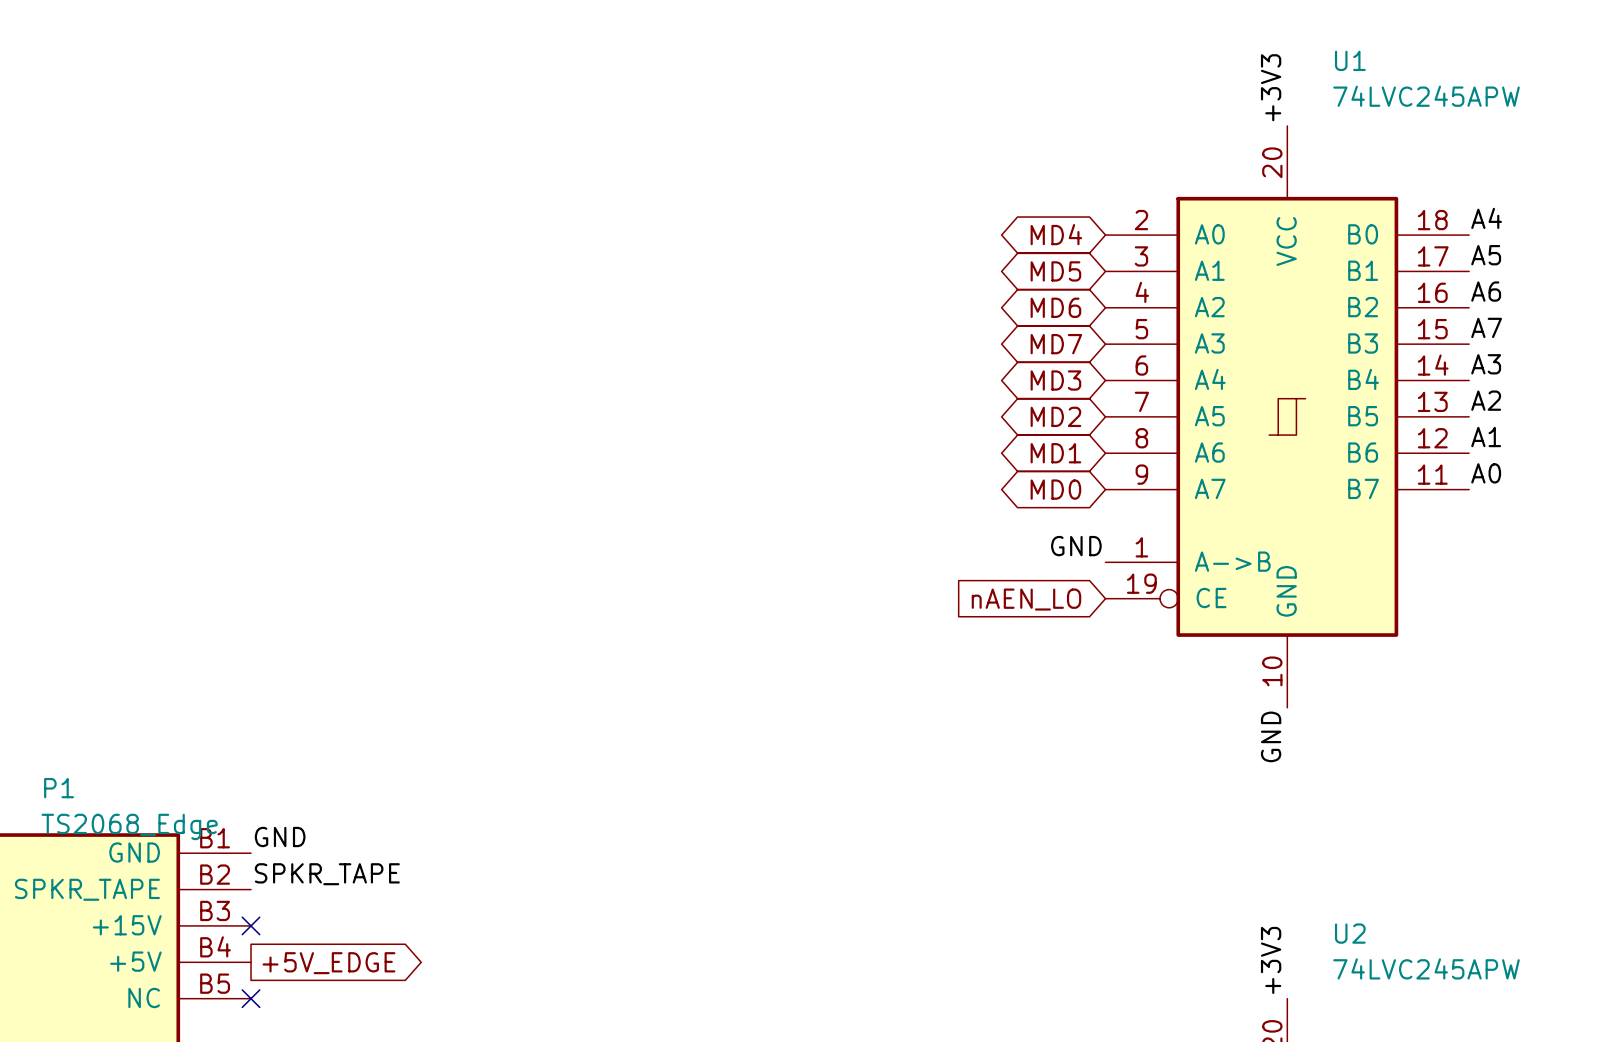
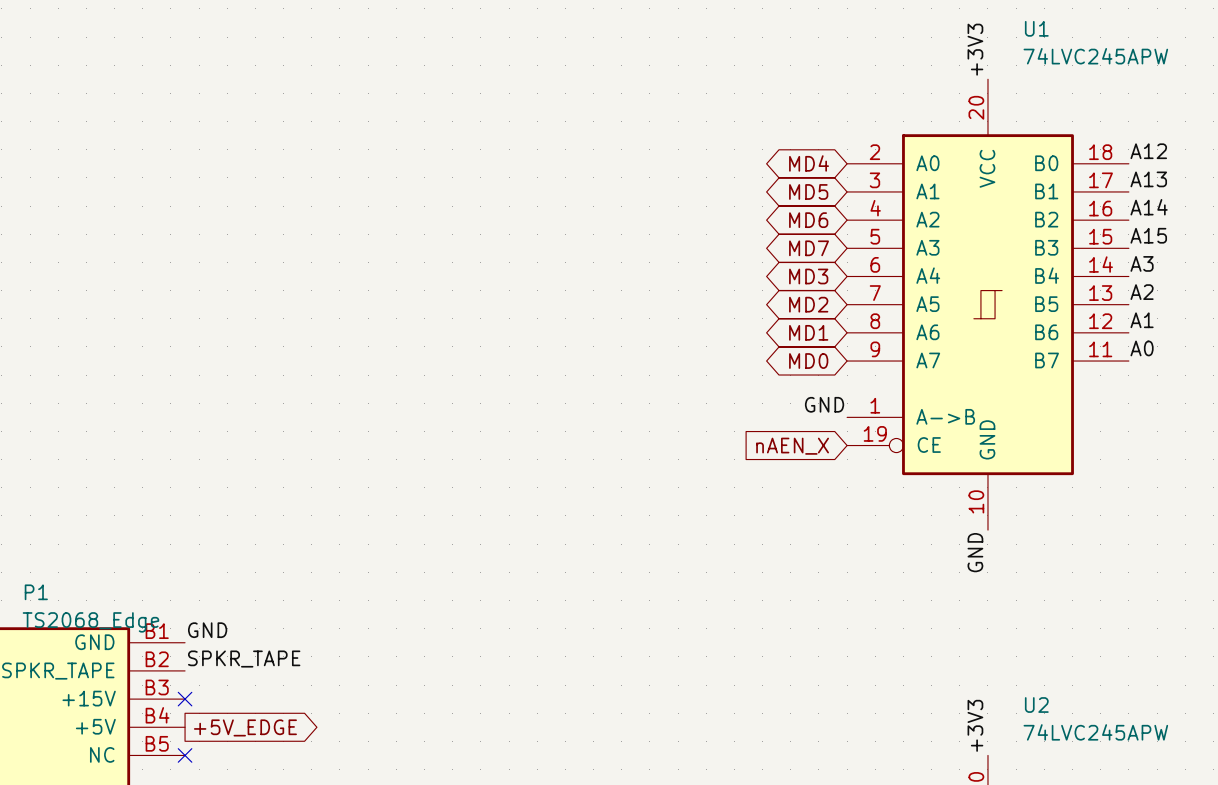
label: A4 (1486, 218) -> A12 (1148, 151)
label: A5 (1486, 255) -> A13 (1148, 179)
label: A6 (1486, 291) -> A14 (1149, 207)
label: A7 (1486, 327) -> A15 (1148, 235)
global label: nAEN_LO (1026, 599) -> nAEN_X (792, 446)

